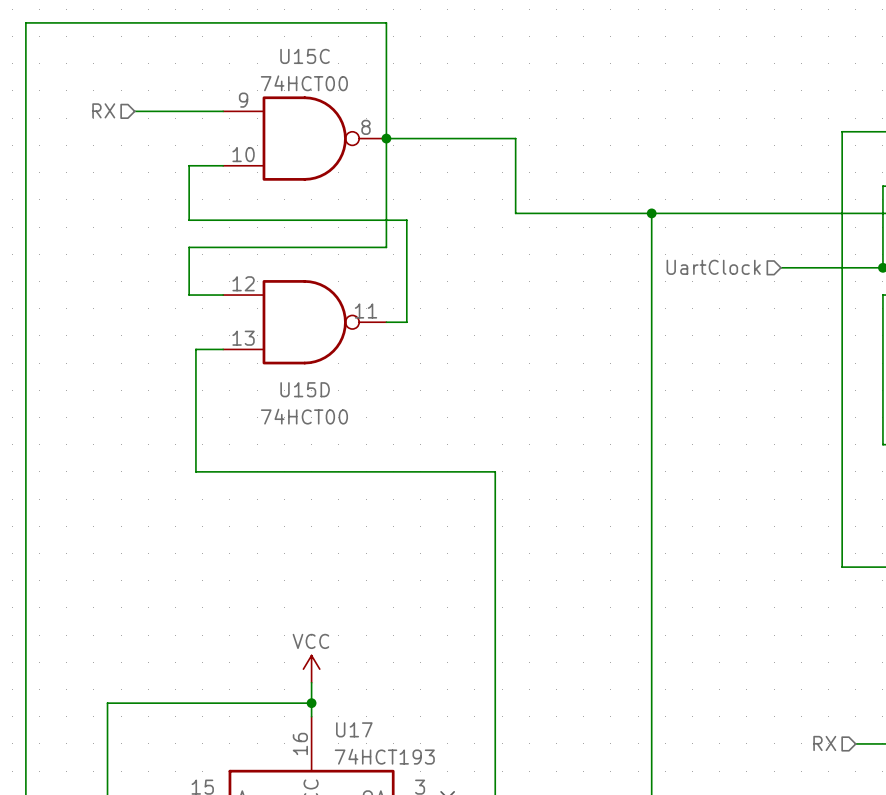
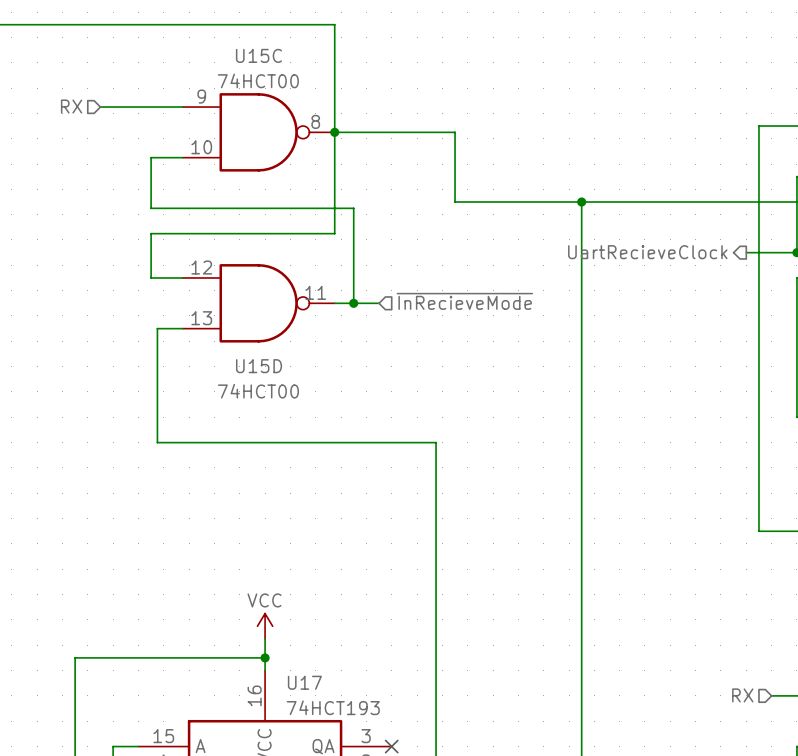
hierarchical label shape: input (713, 267) -> output (647, 252)
hierarchical label: UartClock (713, 267) -> UartRecieveClock (647, 252)
wire: (780, 267) (828, 267) -> none
hierarchical label: none -> ~{InRecieveMode} (464, 301)
wire: none -> (353, 303) (379, 303)
junction: none -> (353, 303)

